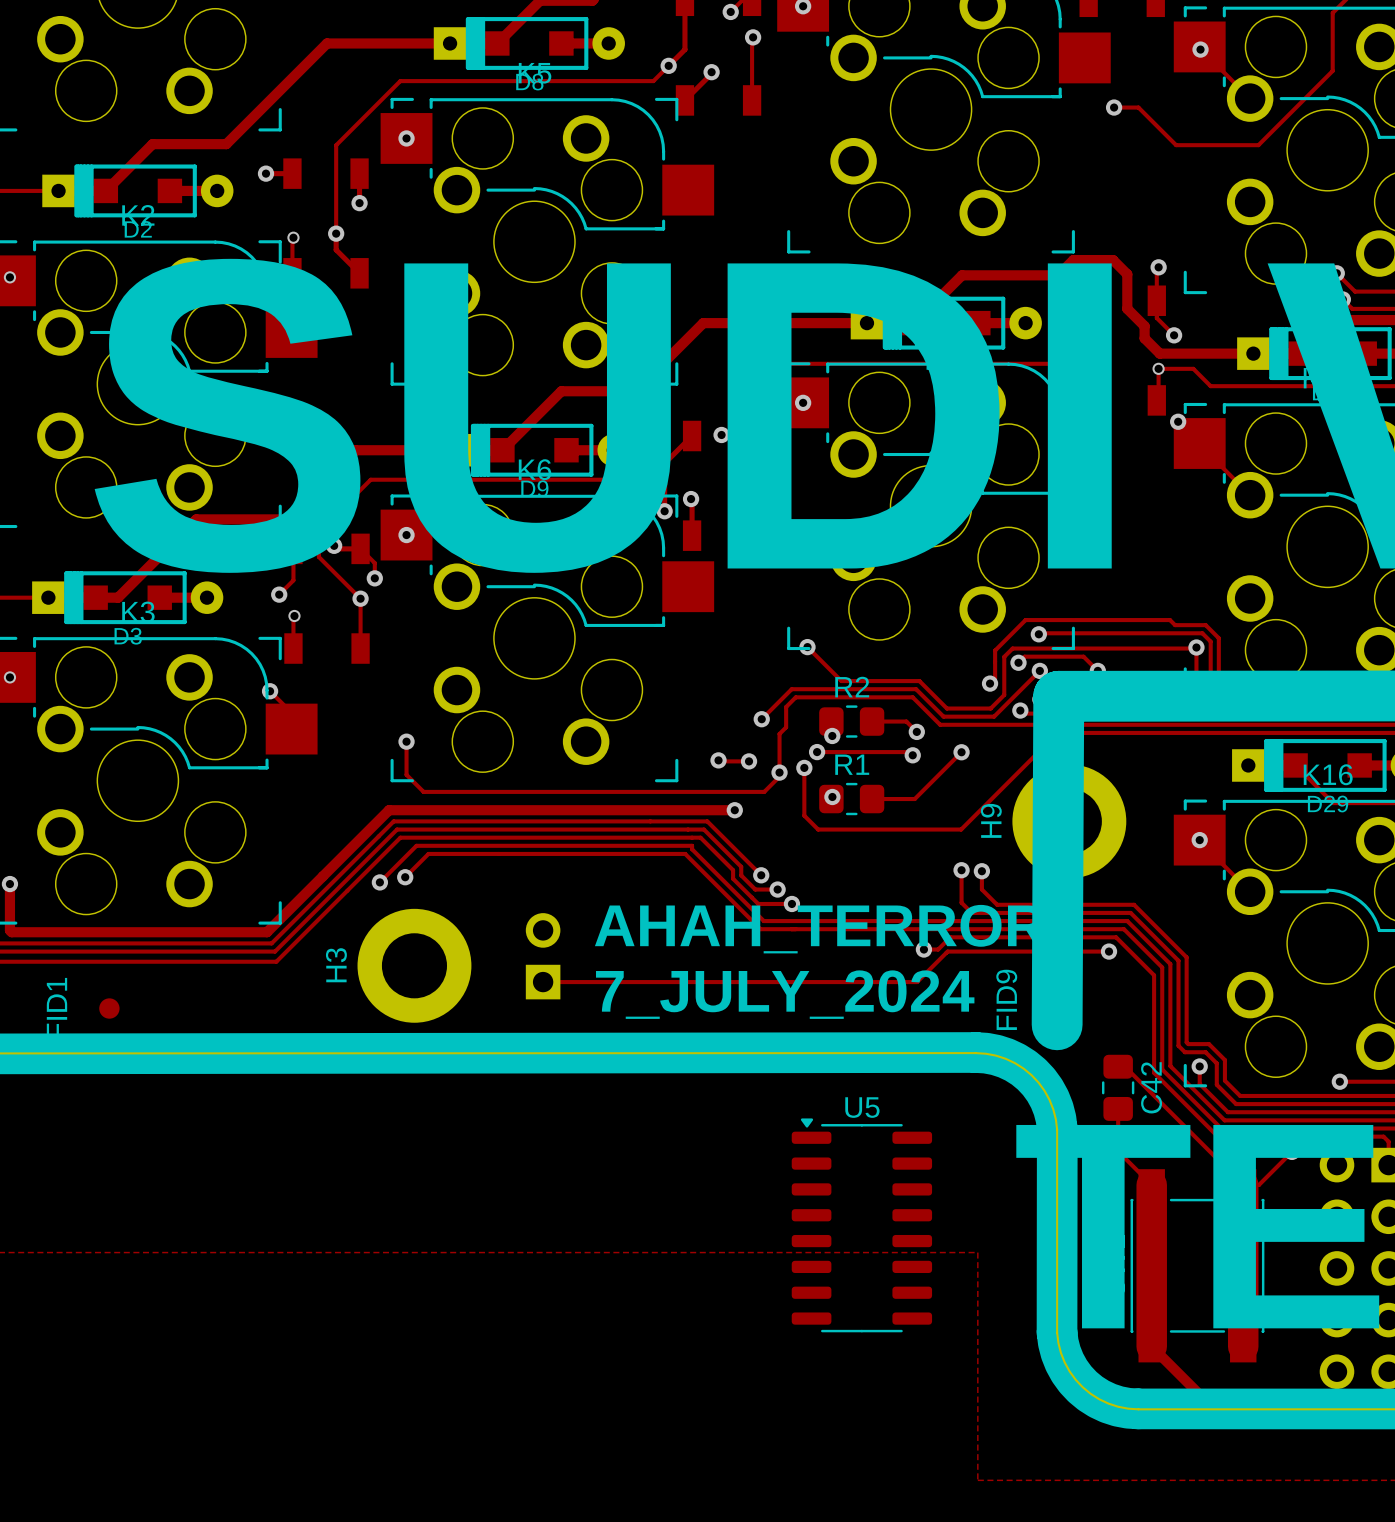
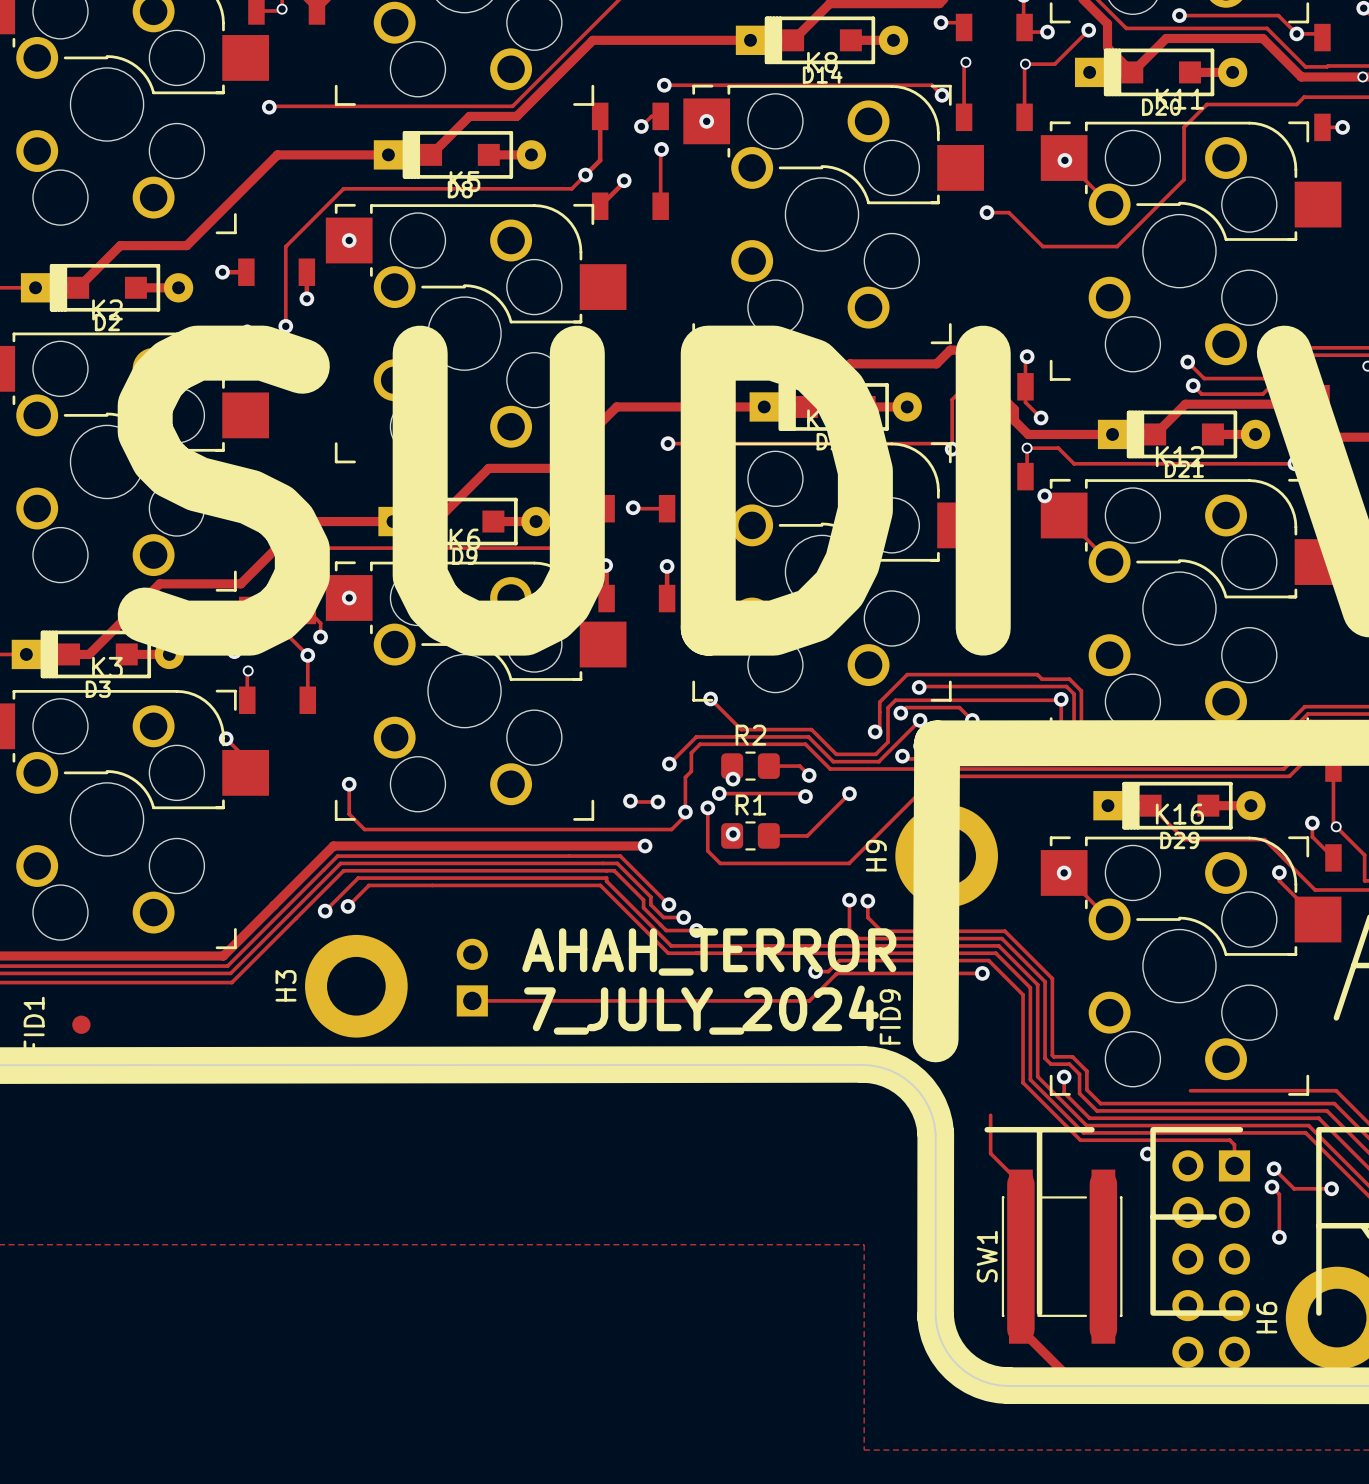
track: (1118, 1066) (1125, 1066) (1243, 1184) (1259, 1184) (1292, 1151) -> none
via: (1339, 1081) -> none
C42: (1118, 1087) -> none
U5: (861, 1225) -> none

